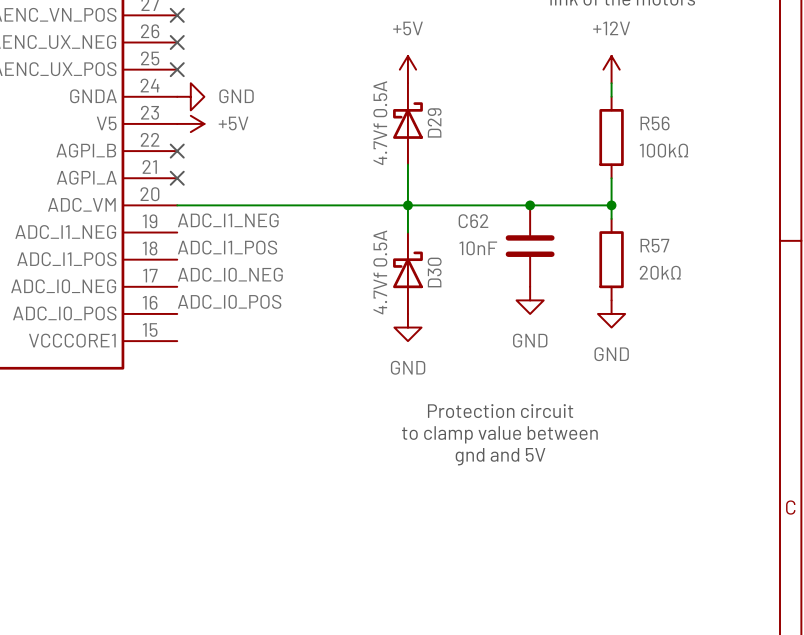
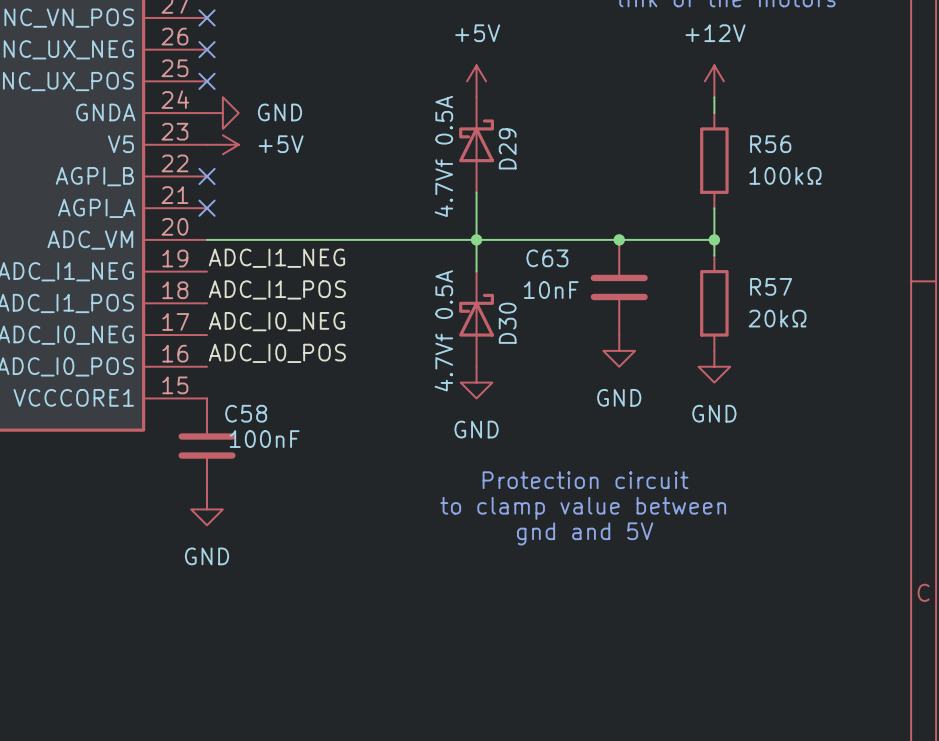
C62 name: C62 (473, 221) -> C63 (547, 258)
C58: none -> 100nF (207, 446)
power symbol: none -> GND (207, 509)

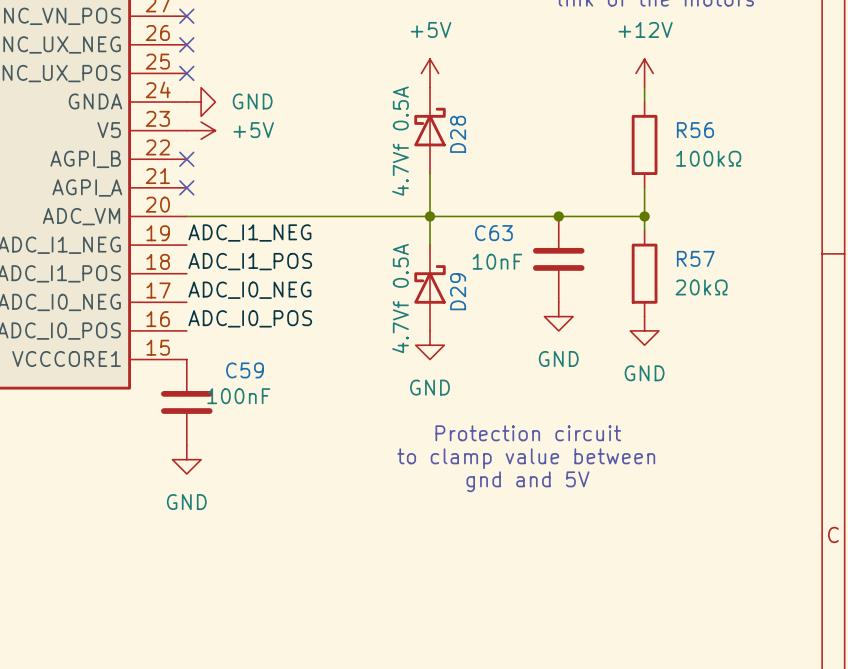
D29 name: D29 (507, 148) -> D28 (458, 134)
D30 name: D30 (507, 323) -> D29 (458, 291)
C58 name: C58 (246, 413) -> C59 (245, 370)

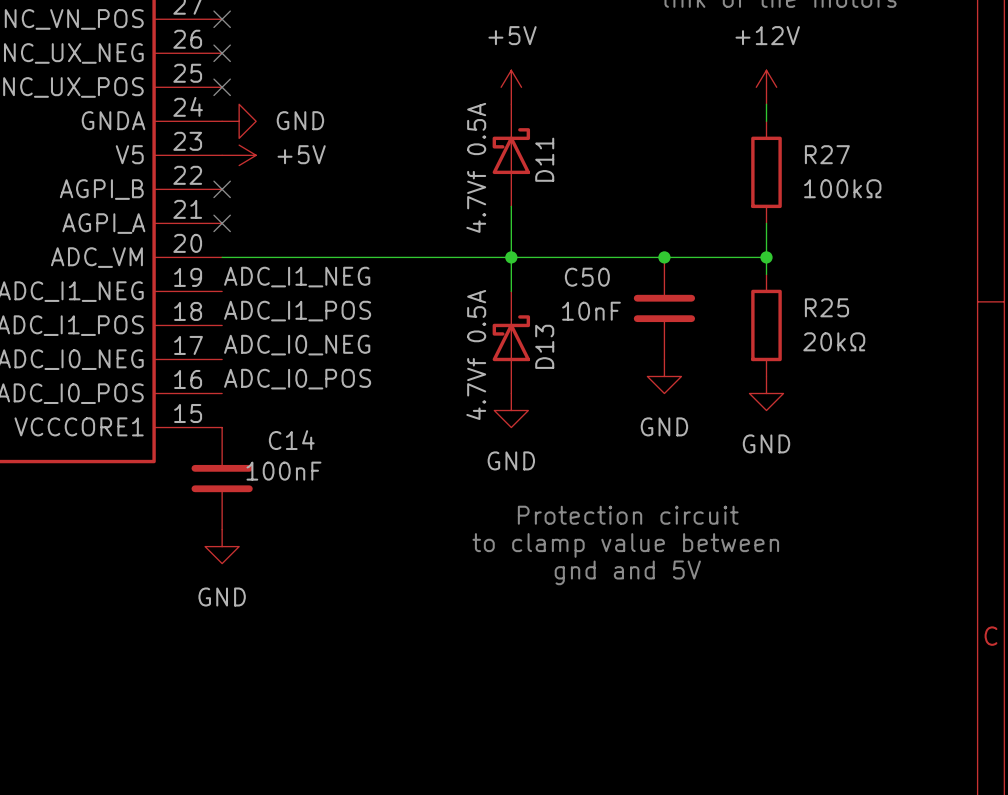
R56 name: R56 (695, 130) -> R27 (827, 154)
D28 name: D28 (458, 134) -> D11 (544, 159)
C63 name: C63 (493, 233) -> C50 (587, 277)
R57 name: R57 (695, 258) -> R25 (826, 307)
D29 name: D29 (458, 291) -> D13 (544, 346)
C59 name: C59 (245, 370) -> C14 (291, 440)

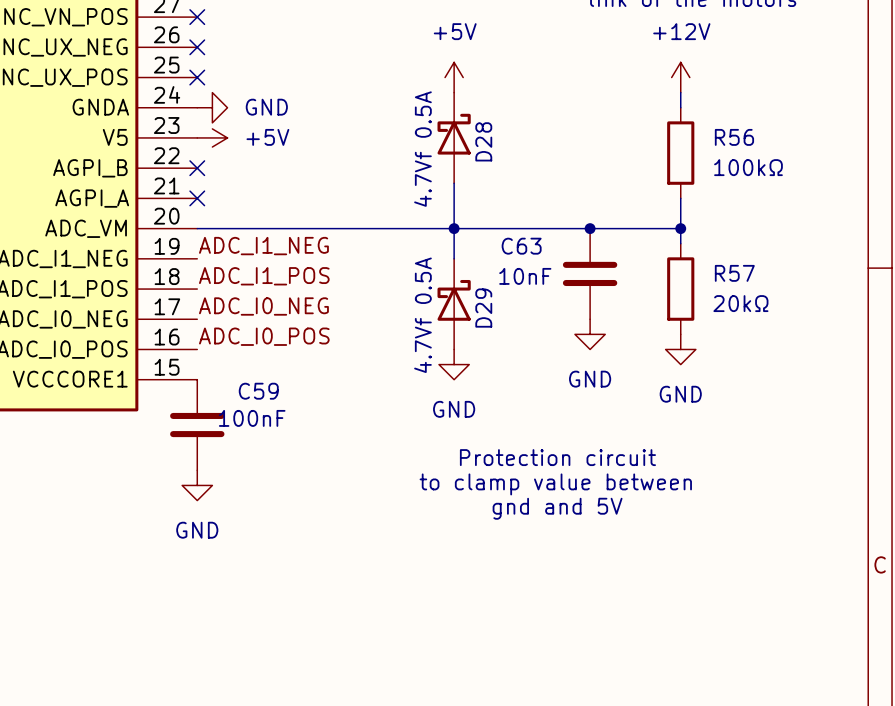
R27 name: R27 (827, 154) -> R56 (734, 137)
D11 name: D11 (544, 159) -> D28 (483, 141)
C50 name: C50 (587, 277) -> C63 (521, 246)
R25 name: R25 (826, 307) -> R57 (734, 273)
D13 name: D13 (544, 346) -> D29 (483, 308)
C14 name: C14 (291, 440) -> C59 (258, 391)

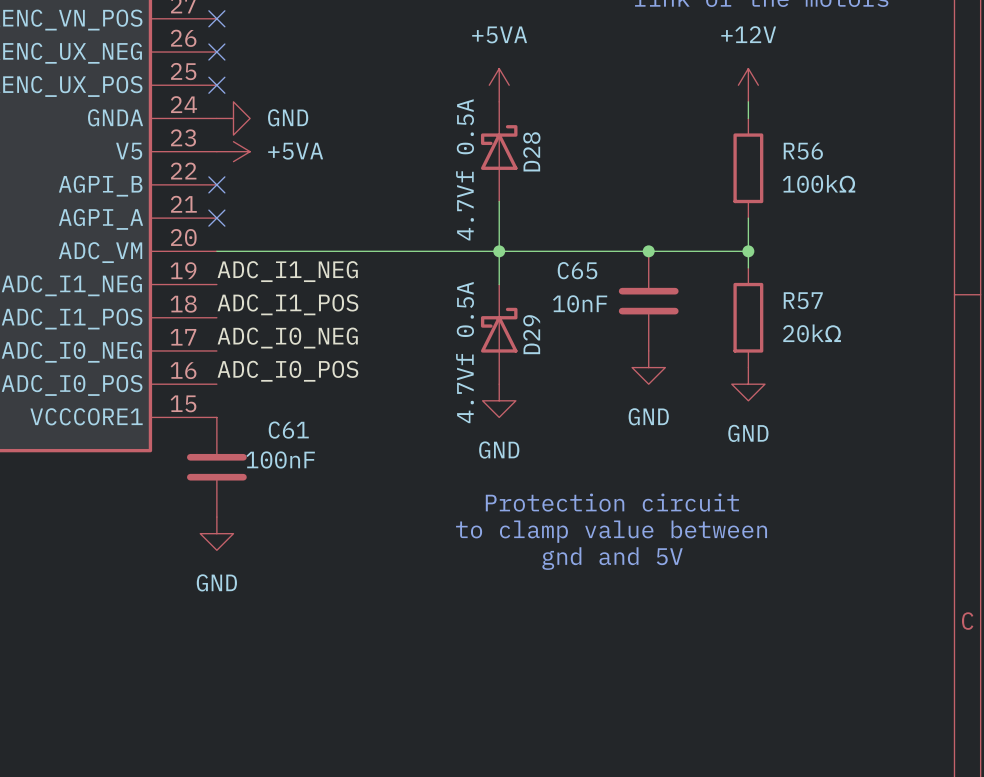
power symbol: +5V (454, 77) -> +5VA (499, 85)
power symbol: +5V (212, 137) -> +5VA (233, 151)
C63 name: C63 (521, 246) -> C65 (577, 270)
C59 name: C59 (258, 391) -> C61 (288, 430)

